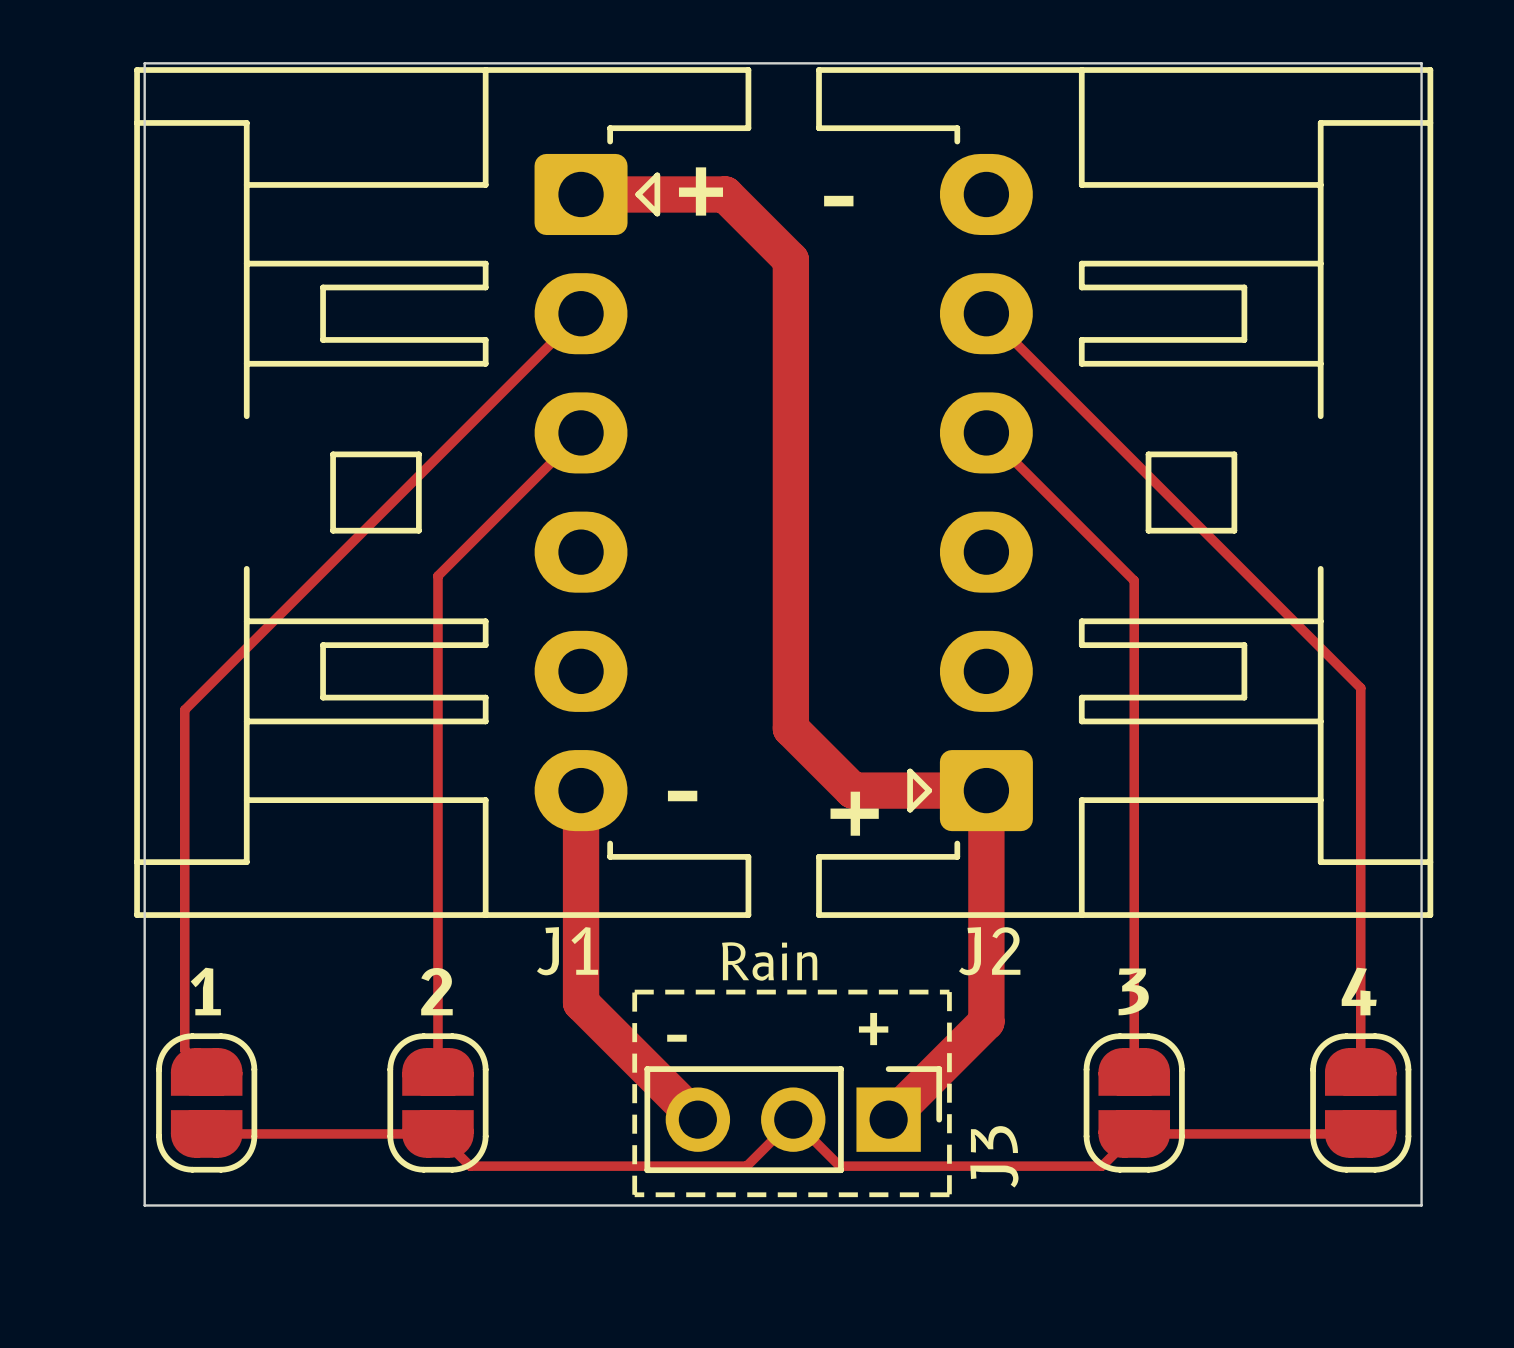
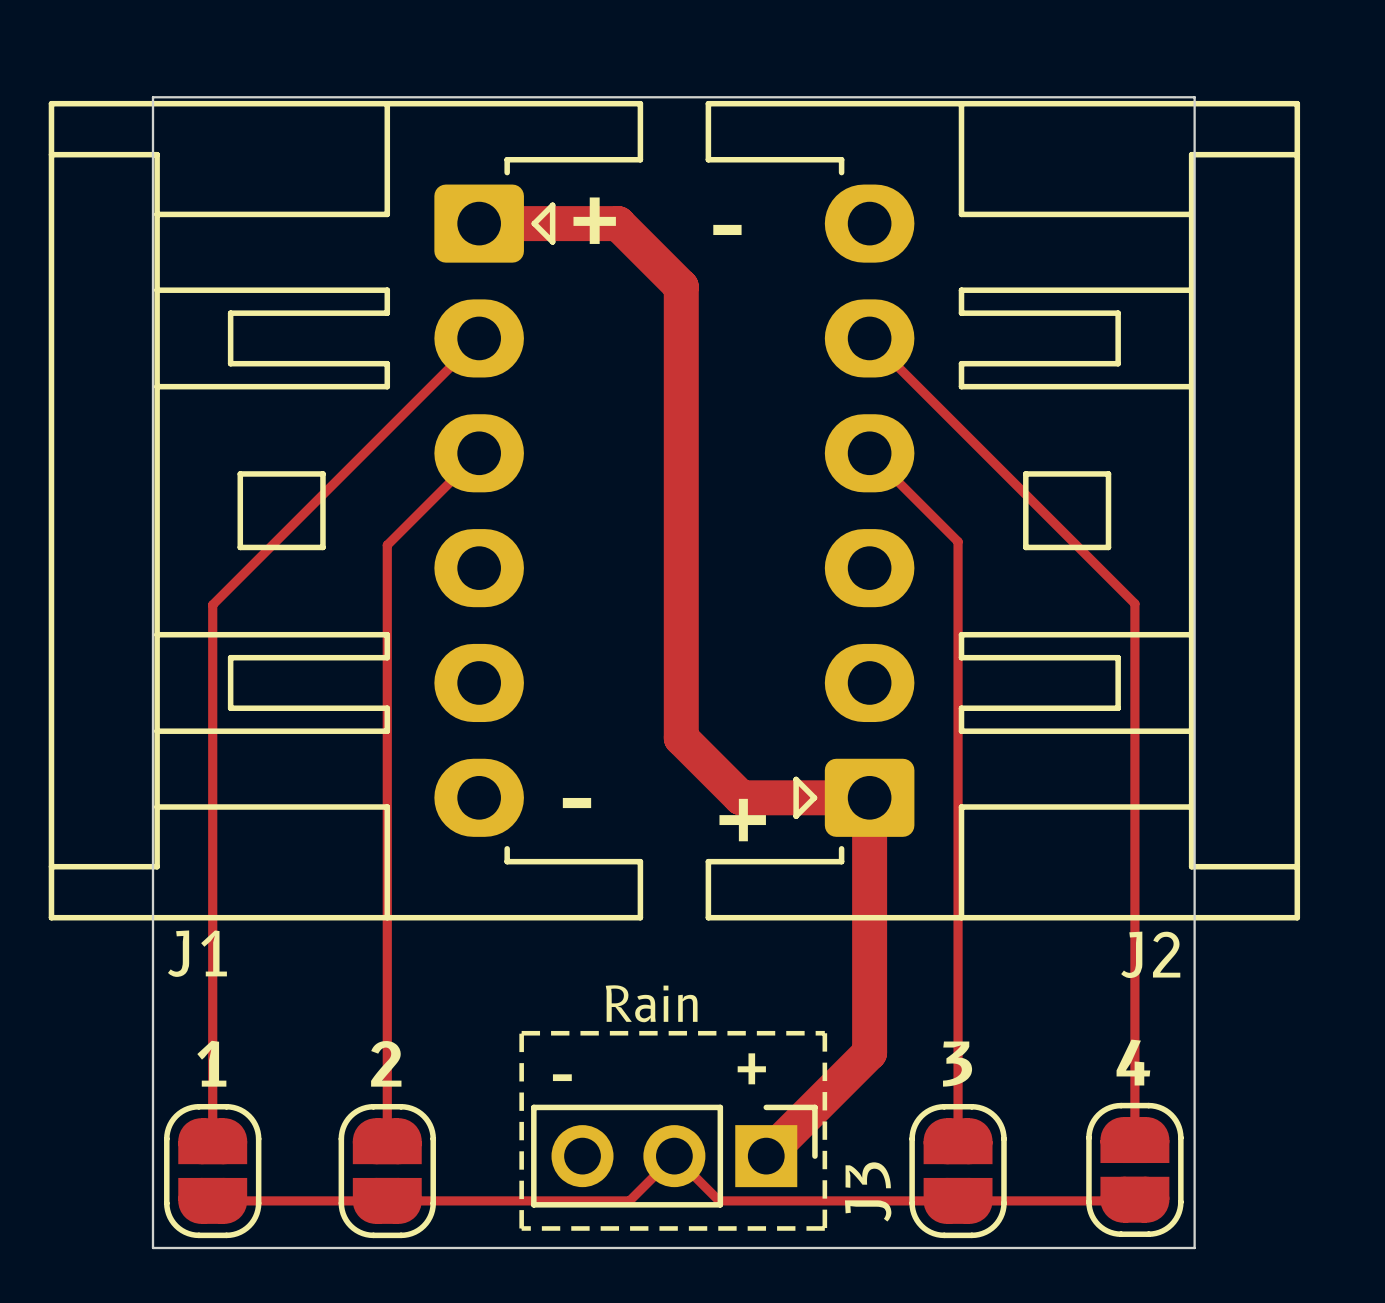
board edge: (242, 63) (144, 63) (144, 1205) (1421, 1205) (1421, 63) (1323, 63) -> (153, 97) (153, 1248) (1194, 1248) (1194, 97)
J1 footprint: [134, 67, 752, 918] -> [48, 100, 644, 921]
J2 footprint: [816, 67, 1434, 918] -> [705, 100, 1301, 921]
track: (1078, 524) (1134, 580) (1134, 1071) -> (958, 541) (958, 1141)
track: (485, 528) (437, 575) (437, 1071) -> (387, 545) (387, 1141)
track: (1261, 589) (1360, 688) (1360, 1071) -> (1134, 603) (1134, 1140)
track: (304, 590) (184, 709) (184, 1050) (206, 1071) -> (212, 604) (212, 1141)
track: (581, 790) (581, 1002) (697, 1119) -> none
J1 name position: J1 (567, 951) -> J1 (197, 953)
J2 name position: J2 (989, 951) -> J2 (1150, 954)
text position: Rain (769, 961) -> Rain (651, 1003)
line: (634, 992) (949, 992) (949, 1194) (634, 1194) (634, 992) -> (521, 1033) (824, 1033) (824, 1228) (521, 1228) (521, 1033)
track: (986, 1021) (888, 1119) -> (869, 1020) (869, 1052) (766, 1156)
text position: + (873, 1029) -> + (751, 1068)
text position: - (676, 1038) -> - (562, 1077)
1 position: (206, 1102) -> (212, 1171)
2 position: (437, 1102) -> (387, 1171)
3 position: (1134, 1102) -> (958, 1171)
4 position: (1360, 1102) -> (1134, 1169)
J3 position: (793, 1119) -> (674, 1156)
track: (206, 1133) (437, 1133) (470, 1166) (746, 1166) (793, 1119) (839, 1166) (1102, 1166) (1134, 1133) (1360, 1133) -> none
track: none -> (1134, 1199) (719, 1200) (674, 1156) (629, 1200) (212, 1200)

